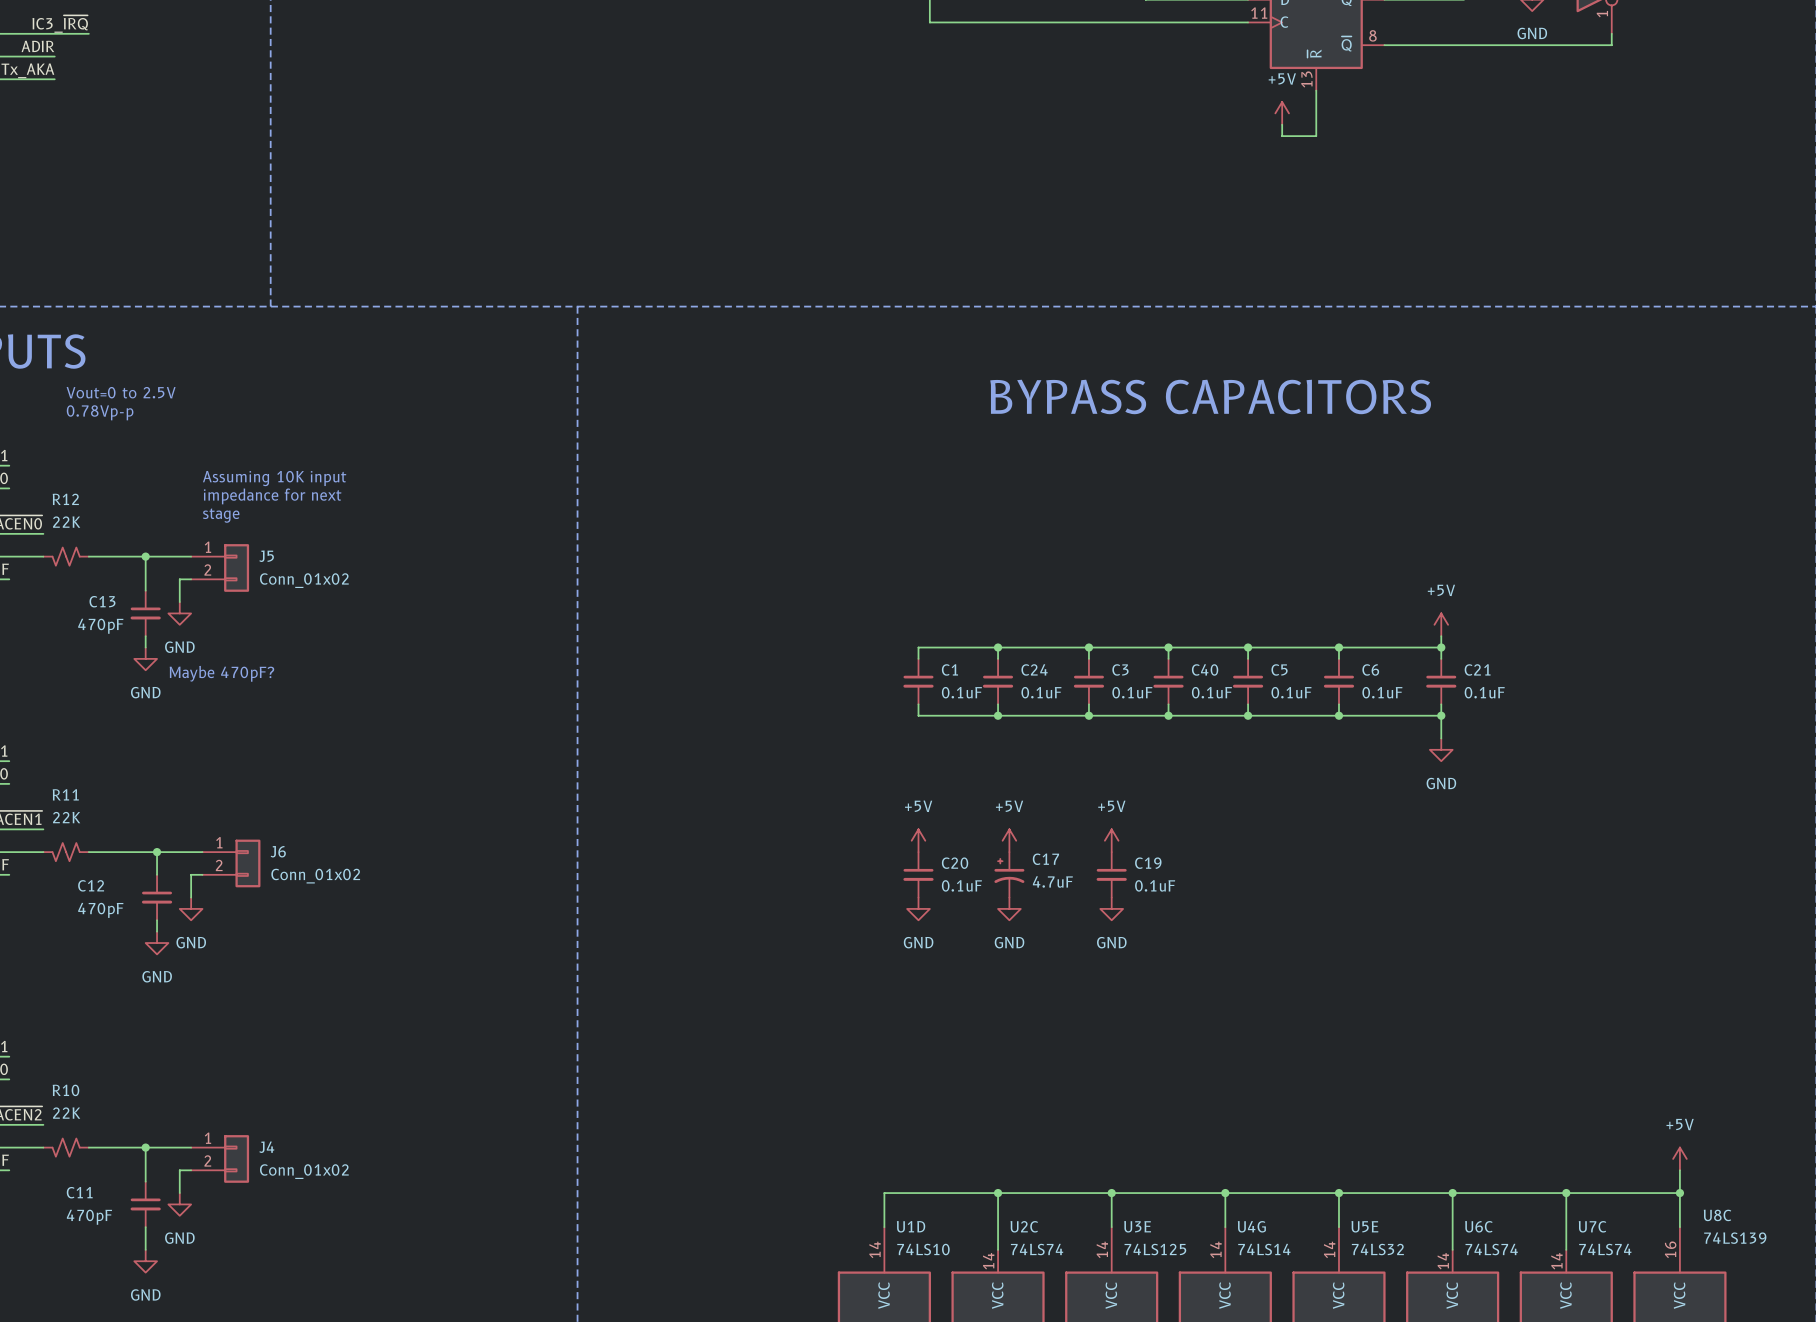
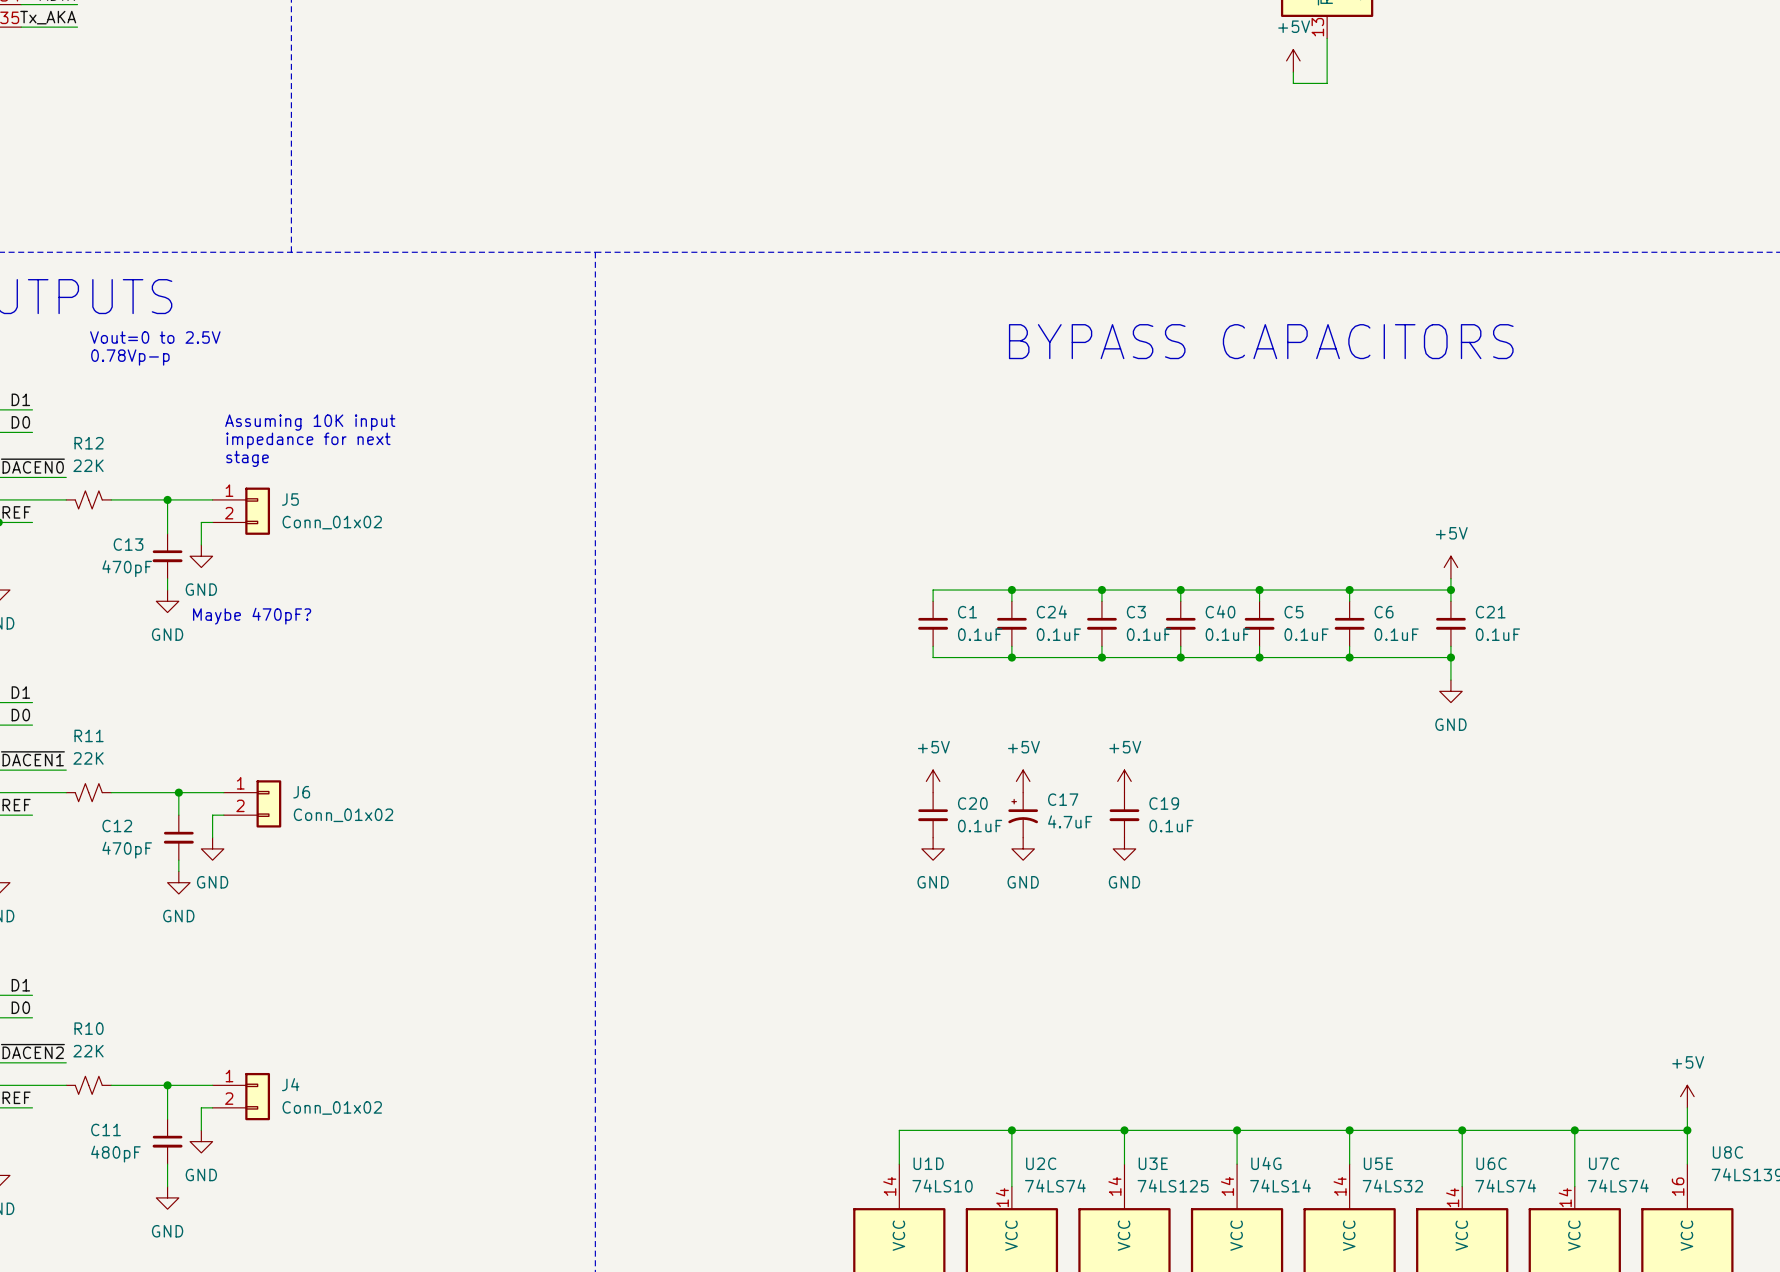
C11 value: 470pF (89, 1217) -> 480pF (115, 1154)

